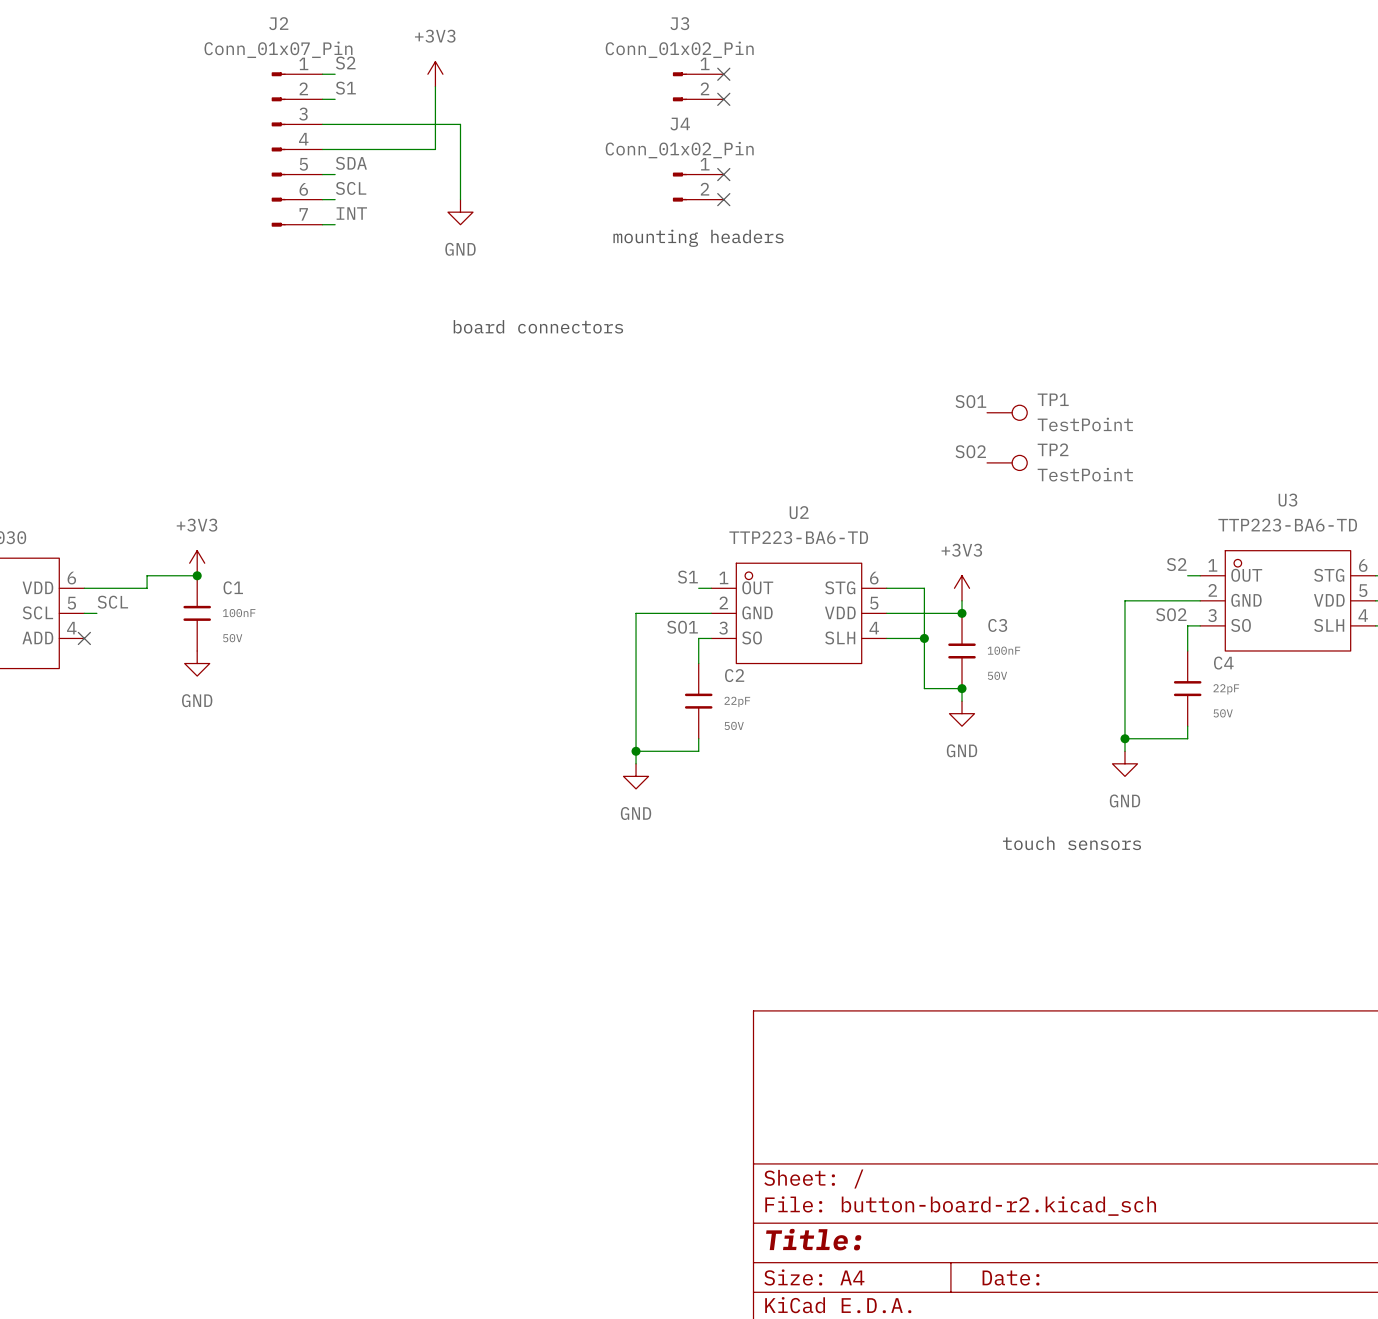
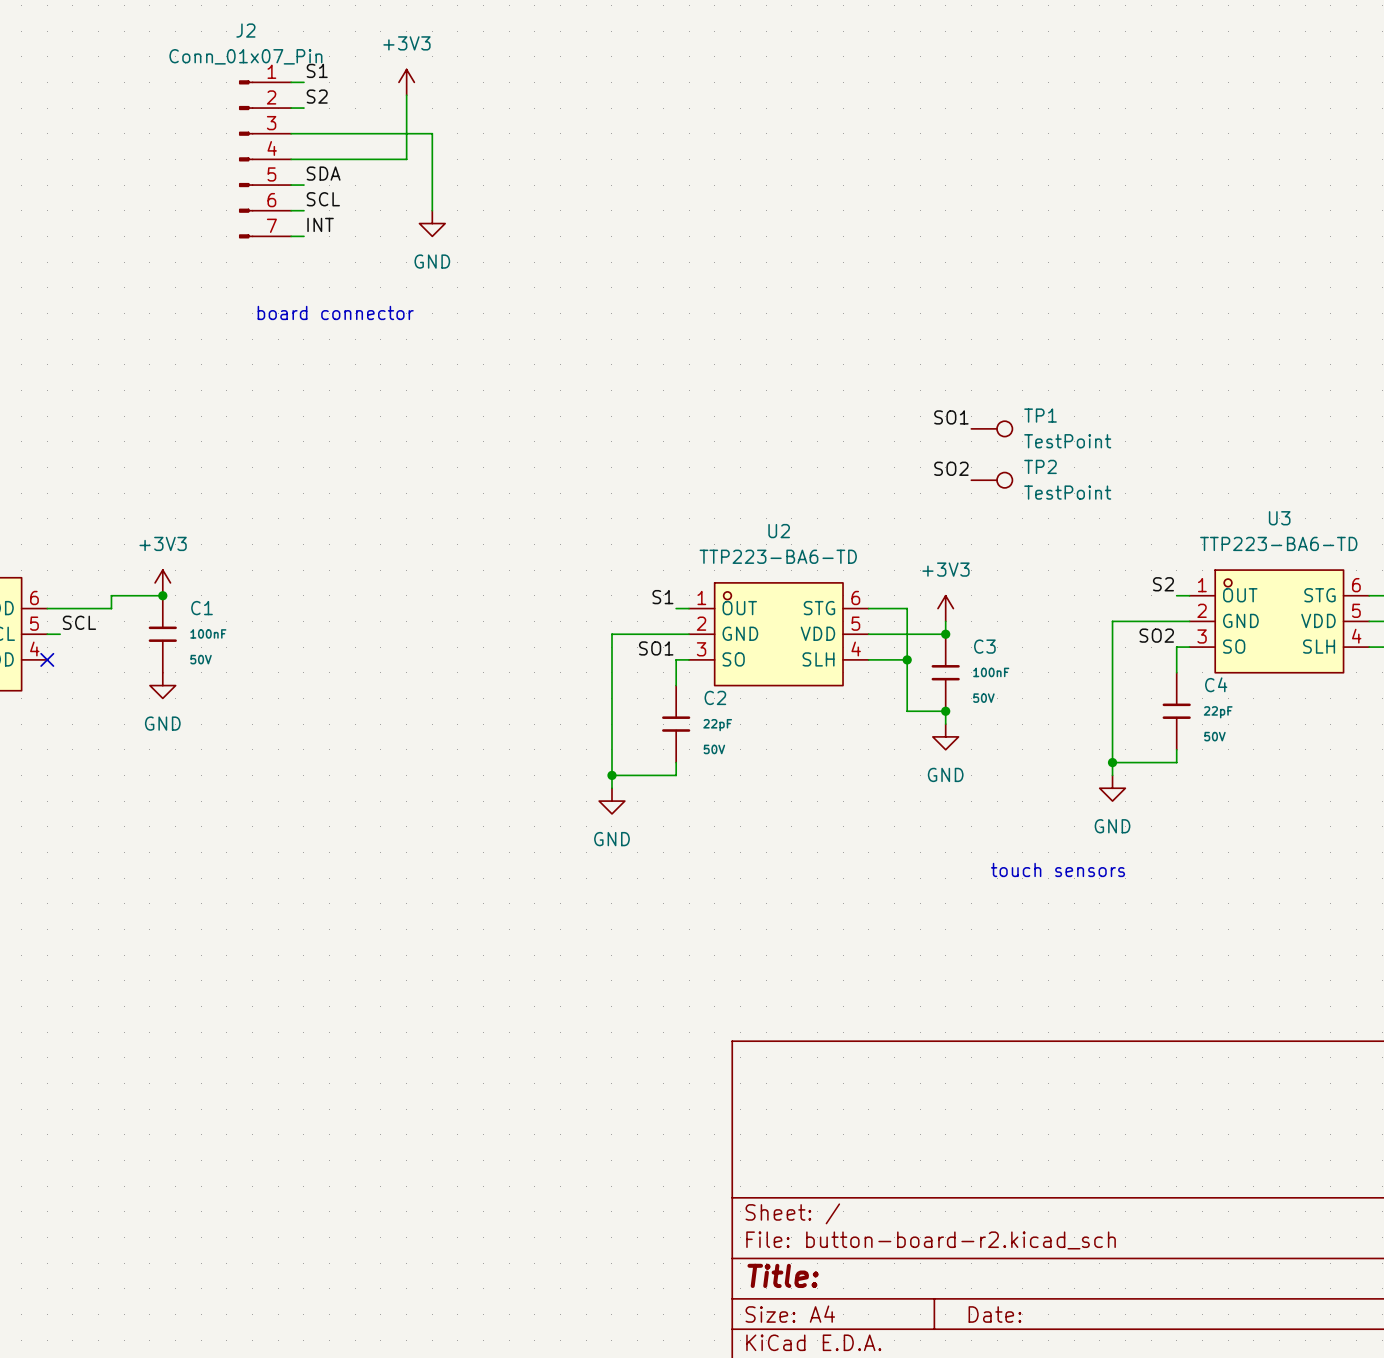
label: S2 (345, 63) -> S1 (317, 70)
no-connect mark: (723, 74) -> none
J3: Conn_01x02_Pin (698, 86) -> none
label: S1 (345, 88) -> S2 (317, 96)
no-connect mark: (723, 99) -> none
no-connect mark: (723, 174) -> none
J4: Conn_01x02_Pin (698, 187) -> none
no-connect mark: (723, 199) -> none
text: mounting headers (698, 238) -> none
text: none -> board connector (335, 312)
text: board connectors (538, 326) -> none

